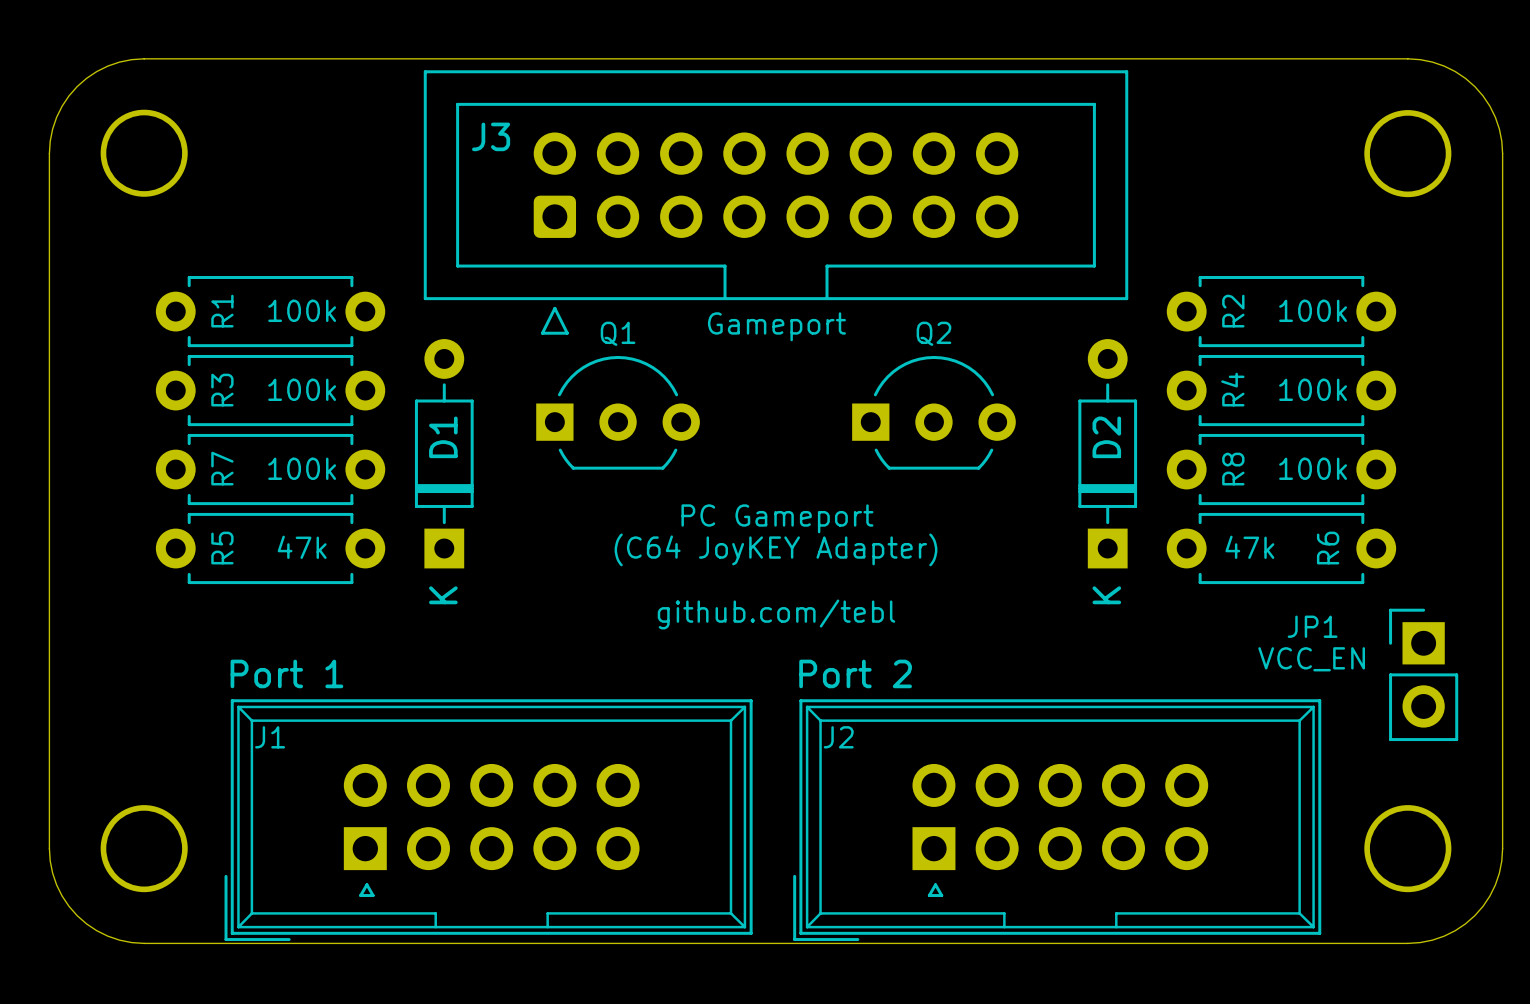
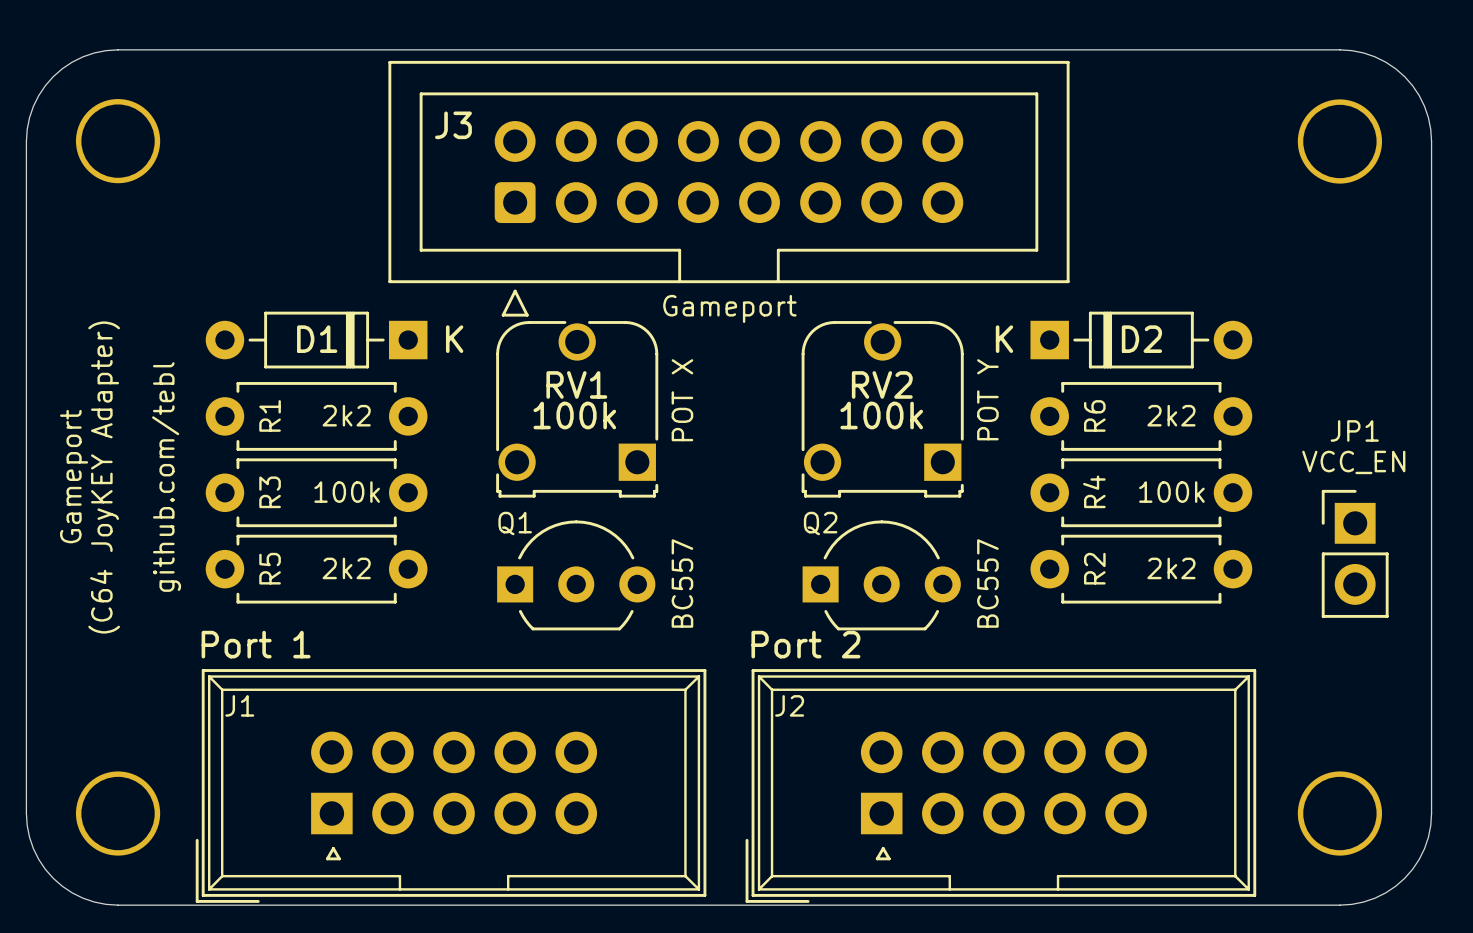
R1 value: 100k (302, 310) -> 2k2 (346, 415)
R2 value: 100k (1313, 310) -> 2k2 (1171, 568)
R1 position: (270, 311) -> (316, 416)
R2 position: (1281, 311) -> (1141, 569)
Q1 name position: Q1 (618, 333) -> Q1 (515, 523)
Q2 name position: Q2 (933, 333) -> Q2 (820, 523)
R3 position: (270, 390) -> (316, 492)
R4 position: (1281, 390) -> (1141, 492)
Q1 position: (618, 412) -> (576, 575)
Q2 position: (933, 412) -> (881, 575)
text: none -> POT Y (987, 399)
text: none -> POT X (682, 400)
RV1: none -> 100k (577, 409)
RV2: none -> 100k (882, 409)
D1 rotation: 0° (444, 453) -> 90° counterclockwise (316, 340)
D2 rotation: 0° (1107, 453) -> 90° clockwise (1141, 340)
R7: 100k (270, 469) -> none
R8: 100k (1281, 469) -> none
text: none -> Gameport (74, 476)
text: none -> (C64 JoyKEY Adapter) (104, 477)
text: PC Gameport (777, 518) -> none
R5 value: 47k (302, 547) -> 2k2 (346, 568)
R6 value: 47k (1249, 547) -> 2k2 (1171, 415)
R5 position: (270, 548) -> (316, 569)
R6 position: (1281, 548) -> (1141, 416)
R6 name position: R6 (1328, 548) -> R6 (1094, 415)
text: (C64 JoyKEY Adapter) (776, 549) -> none
Q1 value: none -> BC557 (682, 583)
Q2 value: none -> BC557 (987, 583)
text rotation: 0° (776, 614) -> 90° counterclockwise (166, 477)
text position: github.com/tebl (776, 614) -> github.com/tebl (166, 477)
JP1 name position: JP1 (1312, 626) -> JP1 (1354, 430)
JP1 value position: VCC_EN (1311, 659) -> VCC_EN (1353, 462)
JP1 position: (1423, 674) -> (1355, 553)

